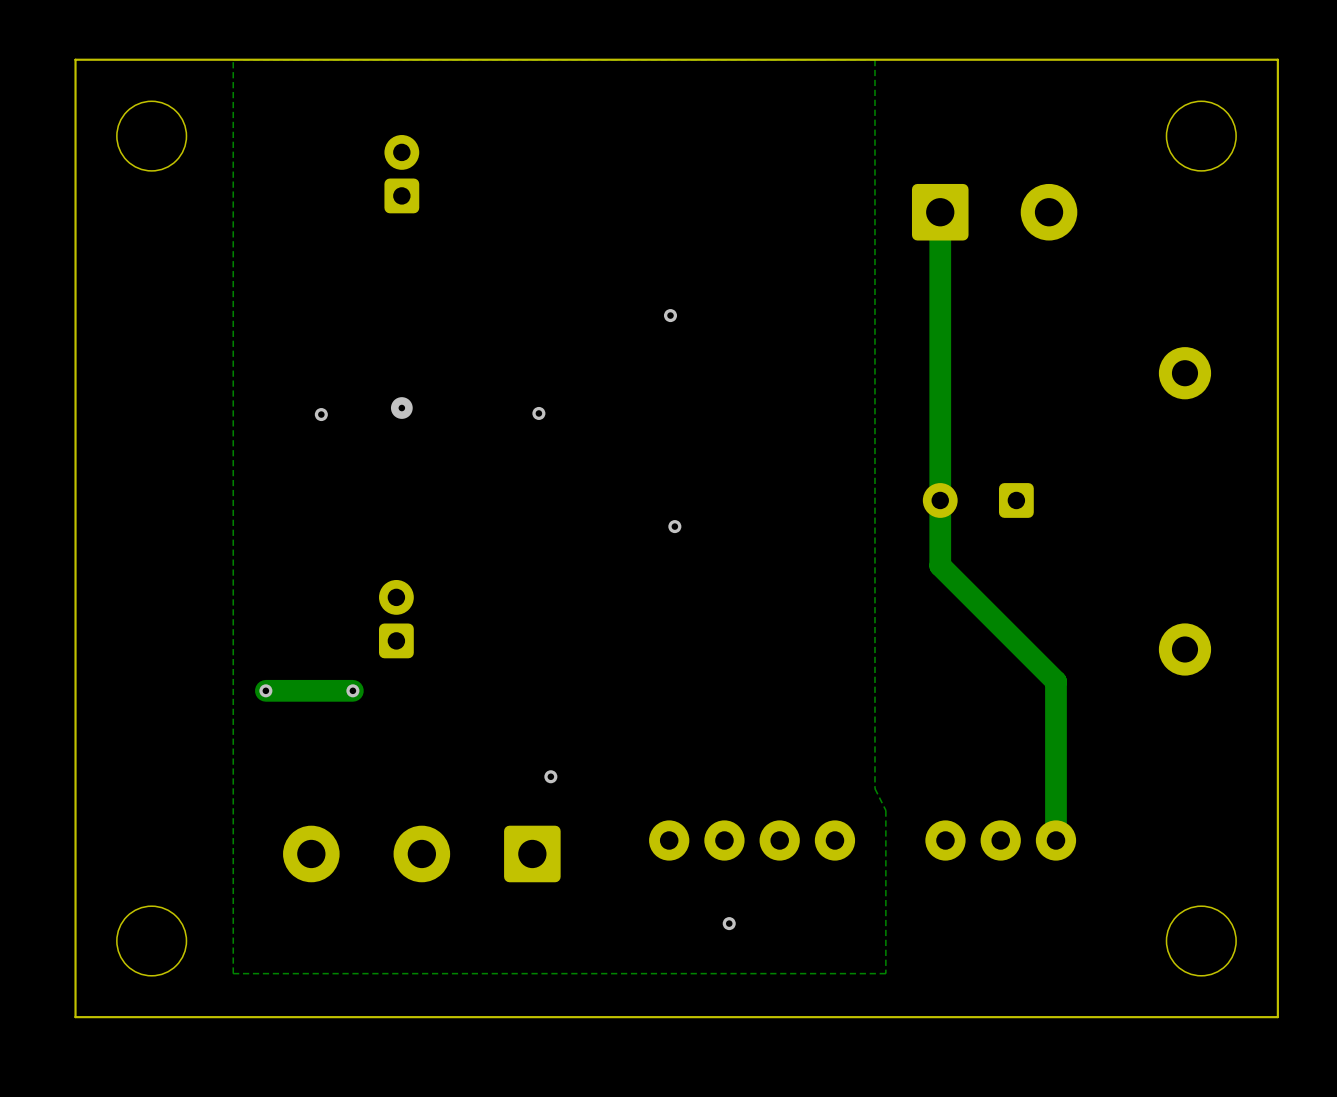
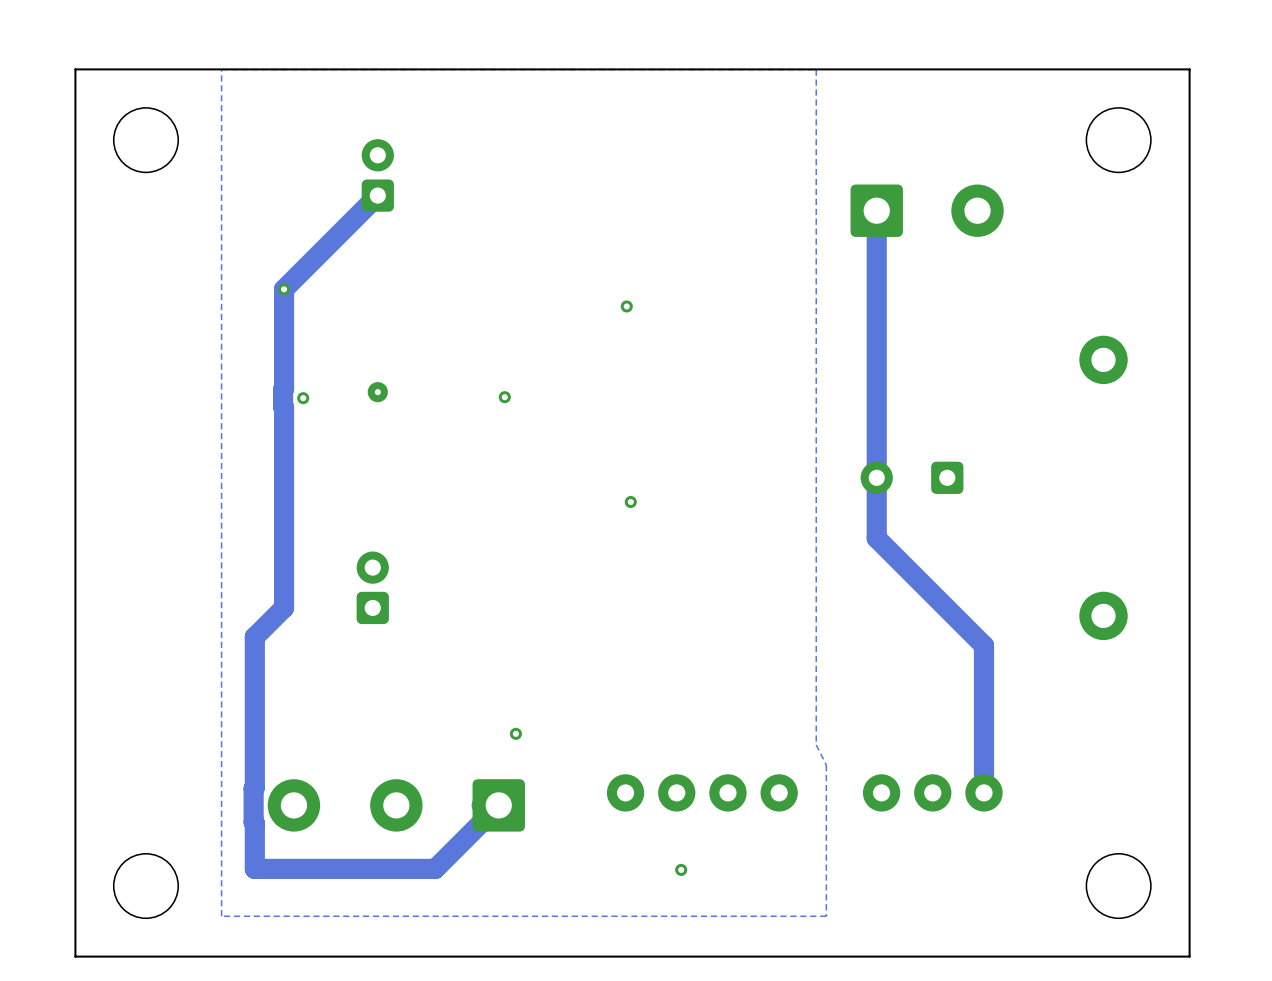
track: none -> (377, 195) (284, 289) (284, 607) (254, 637) (254, 868) (435, 868) (498, 805) (481, 805)
via: none -> (284, 289)
via: (265, 690) -> none
track: (352, 690) (265, 690) -> none
via: (352, 690) -> none

